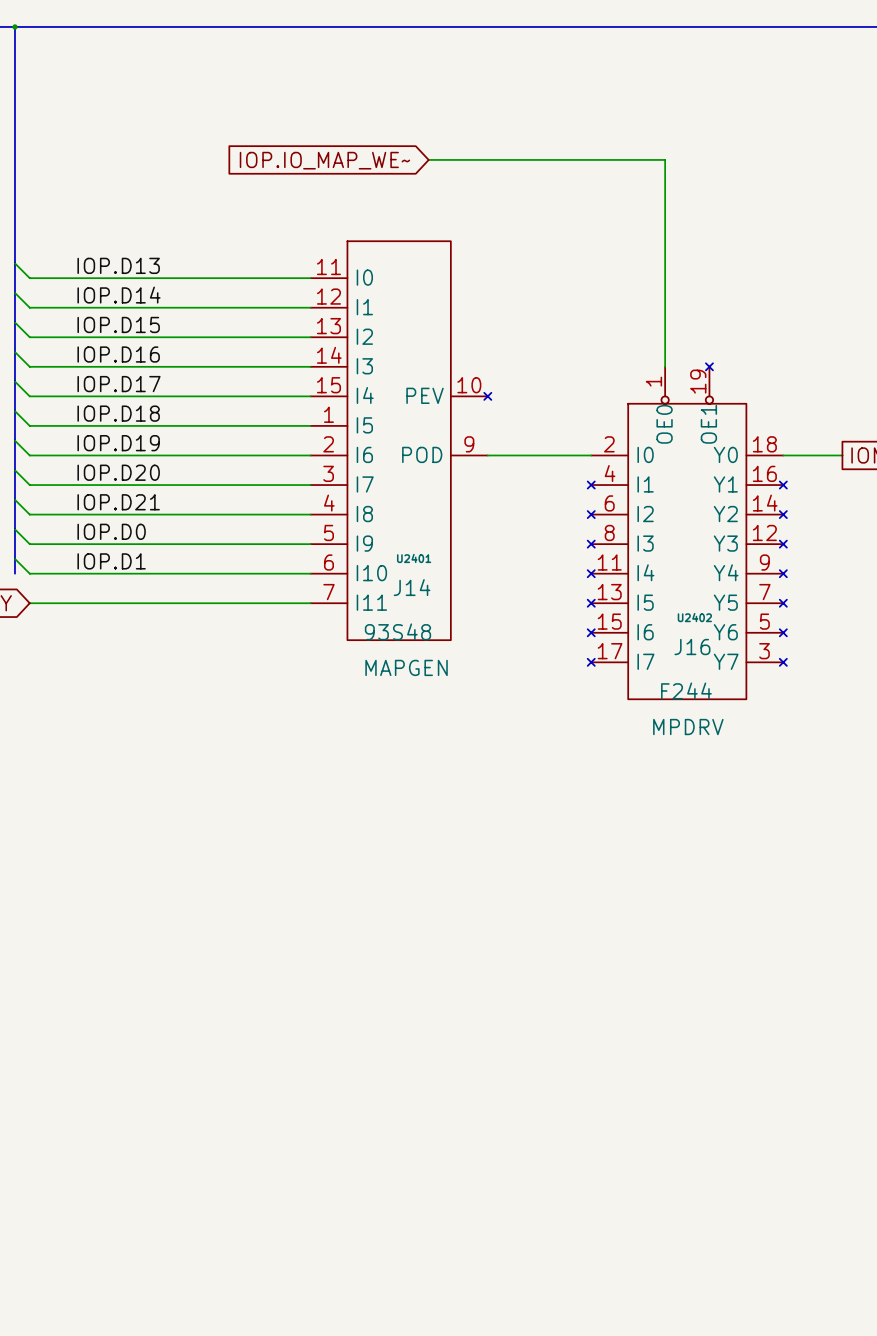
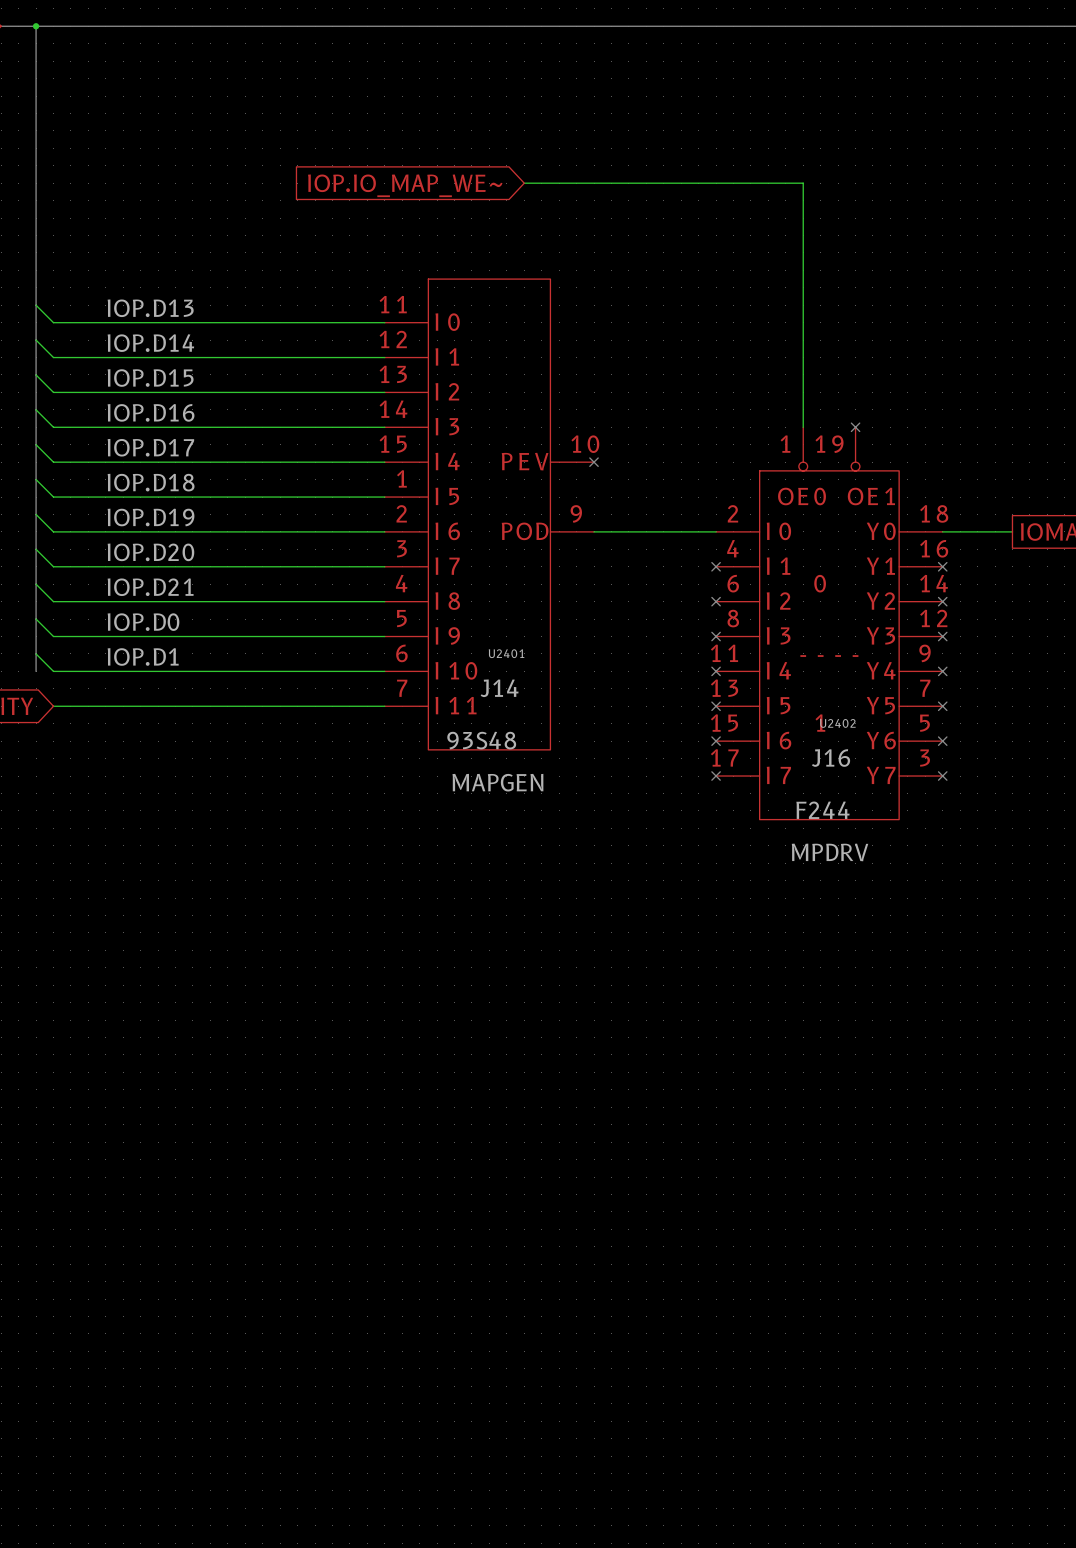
U2401 symbol: [310, 241, 488, 641] -> [384, 279, 595, 750]
U2402 symbol: [591, 366, 784, 700] -> [716, 427, 943, 820]

